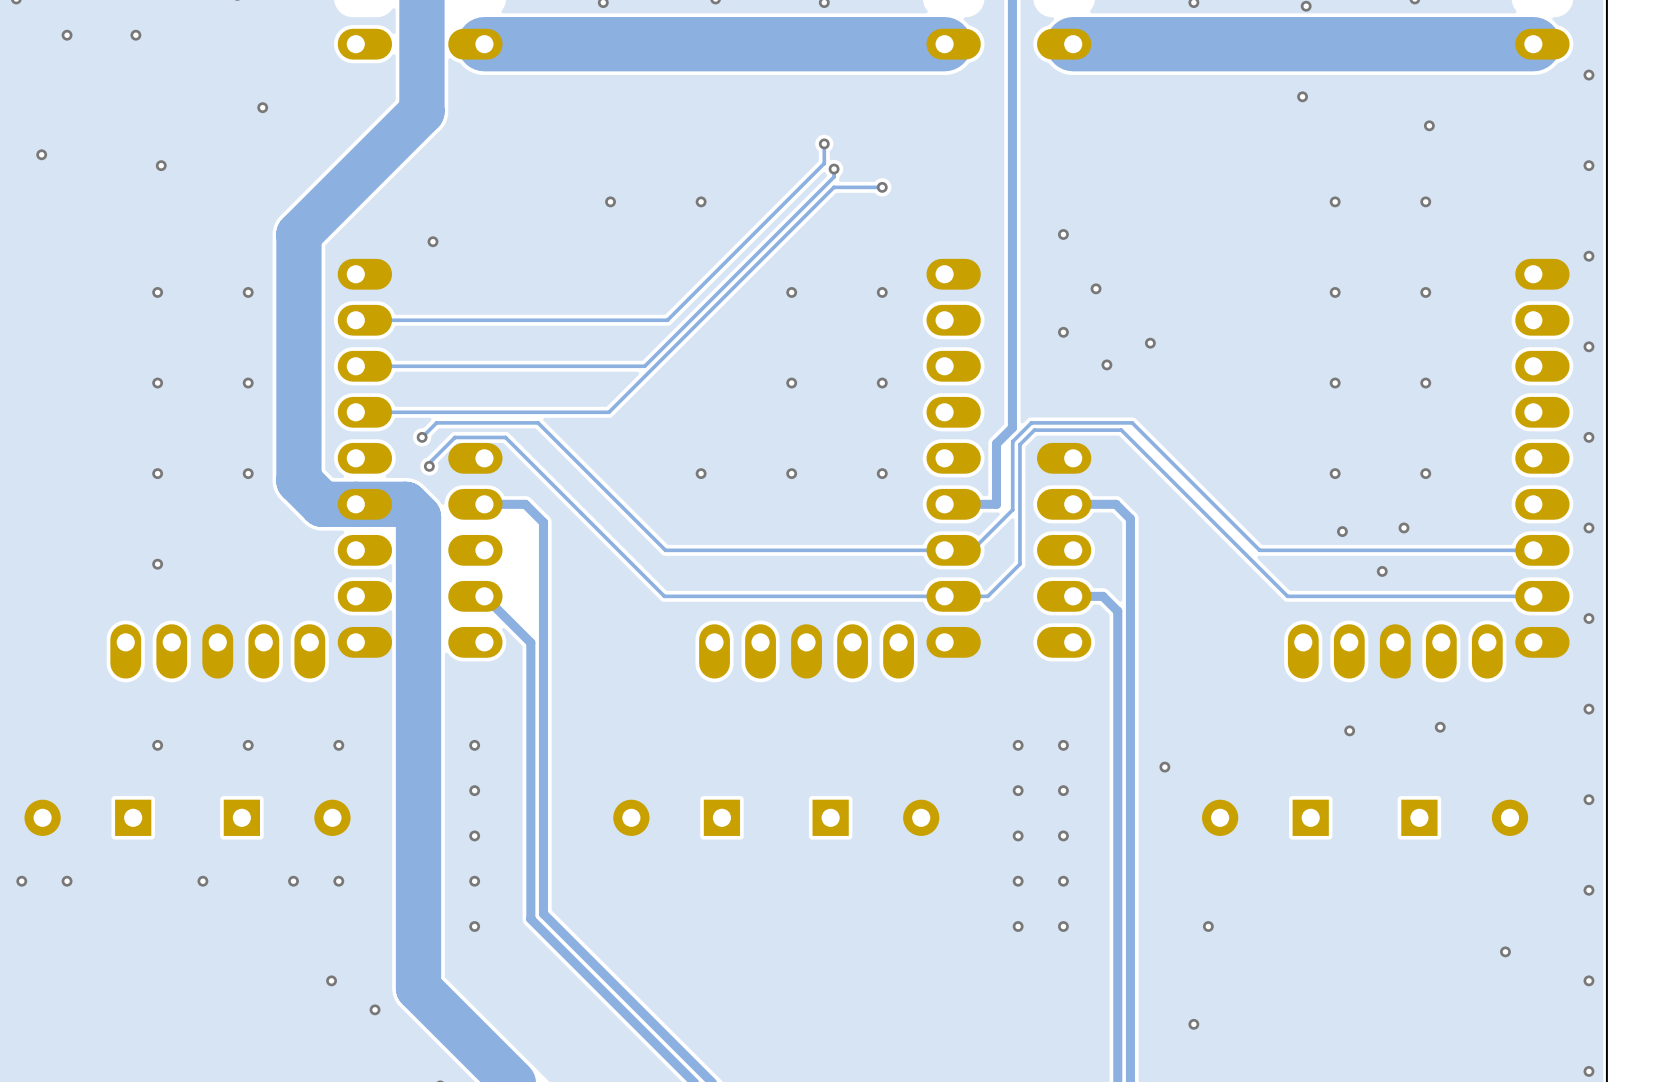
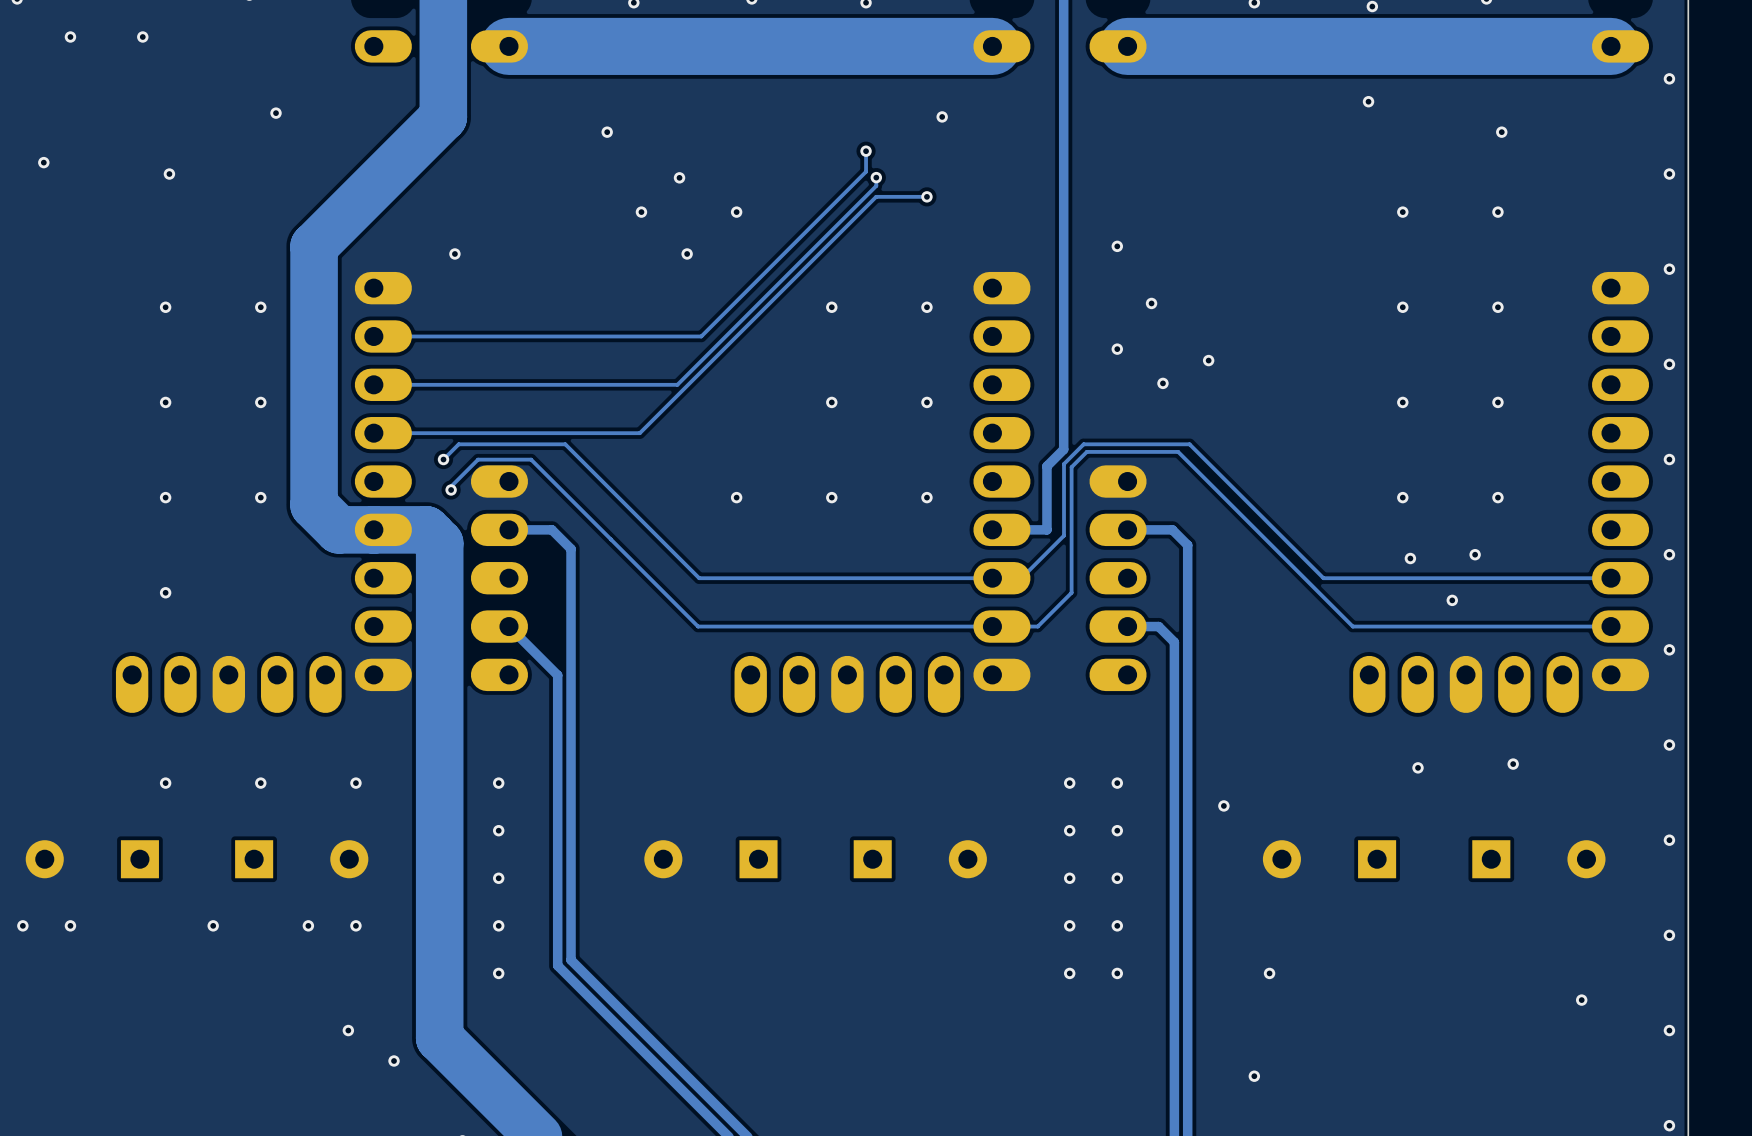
via: none -> (942, 116)
via: none -> (607, 132)
via: none -> (679, 177)
via: none -> (687, 253)

